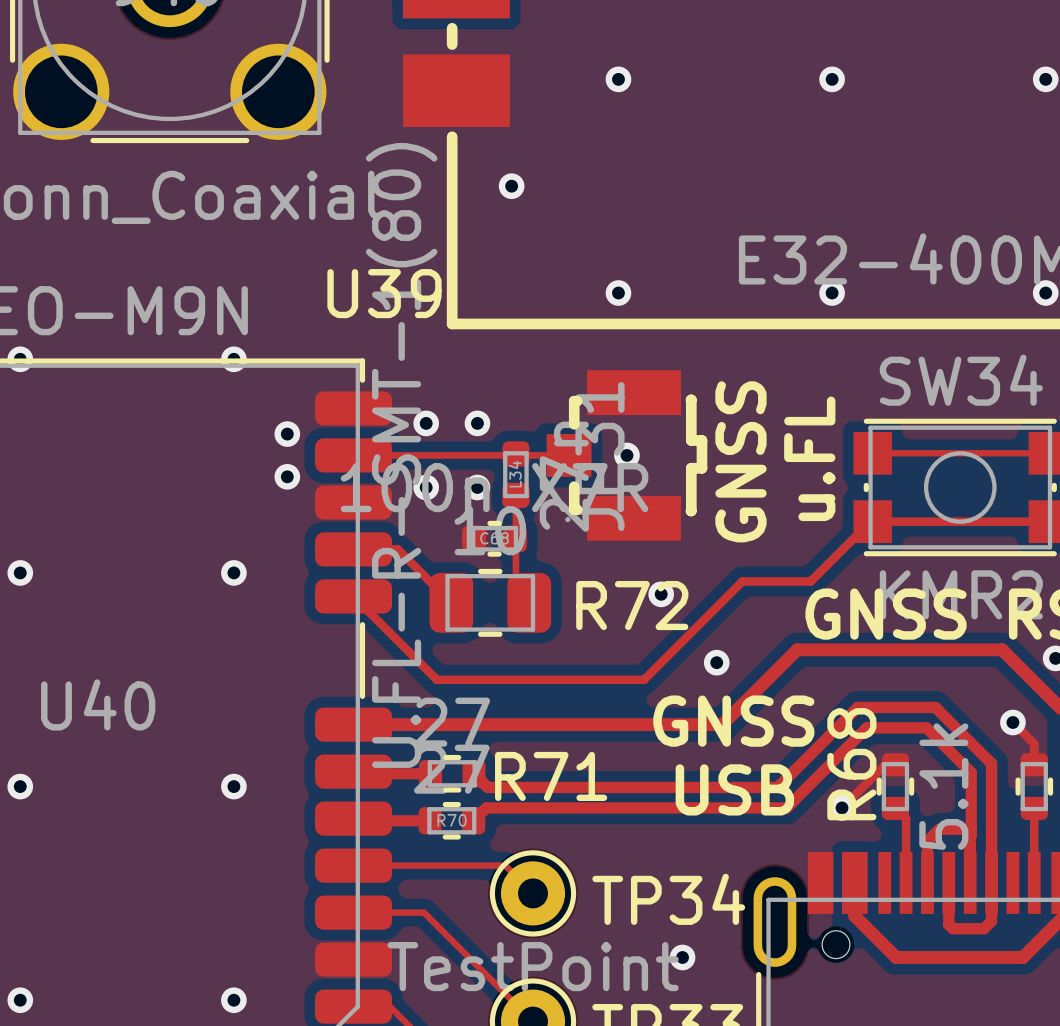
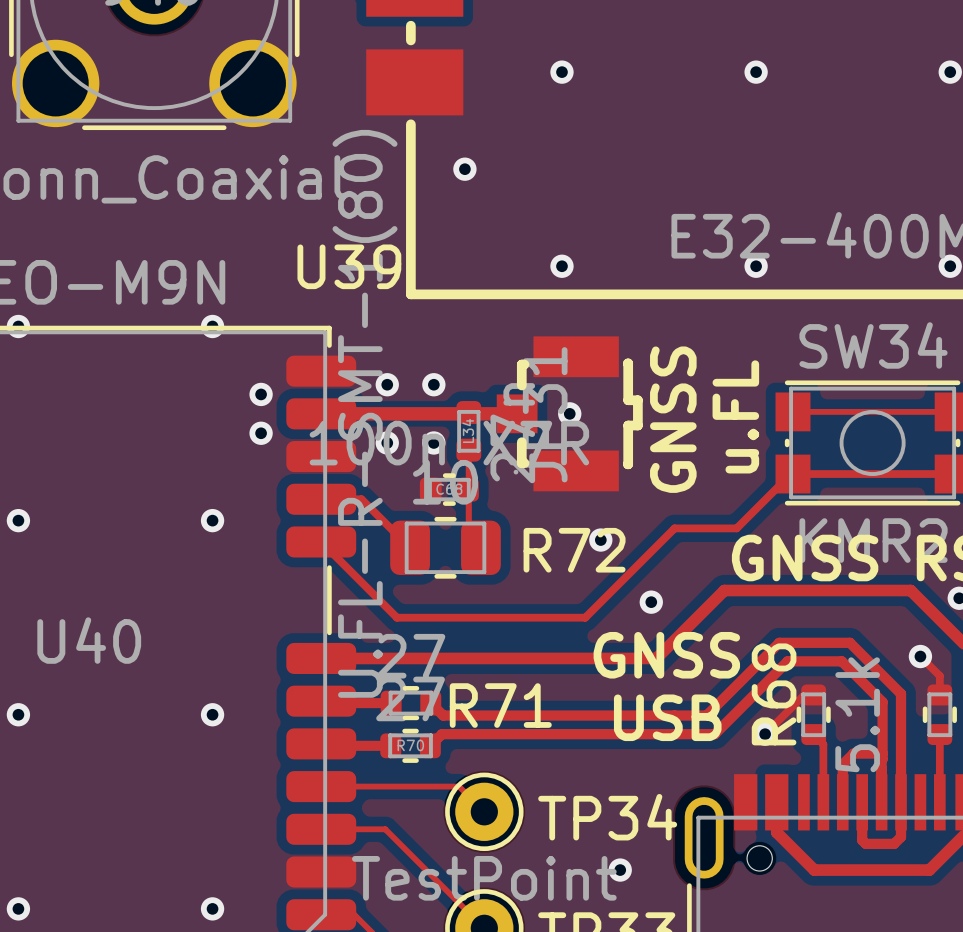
top track width: thin (353, 455) (569, 455) -> thick (321, 413) (517, 413)

